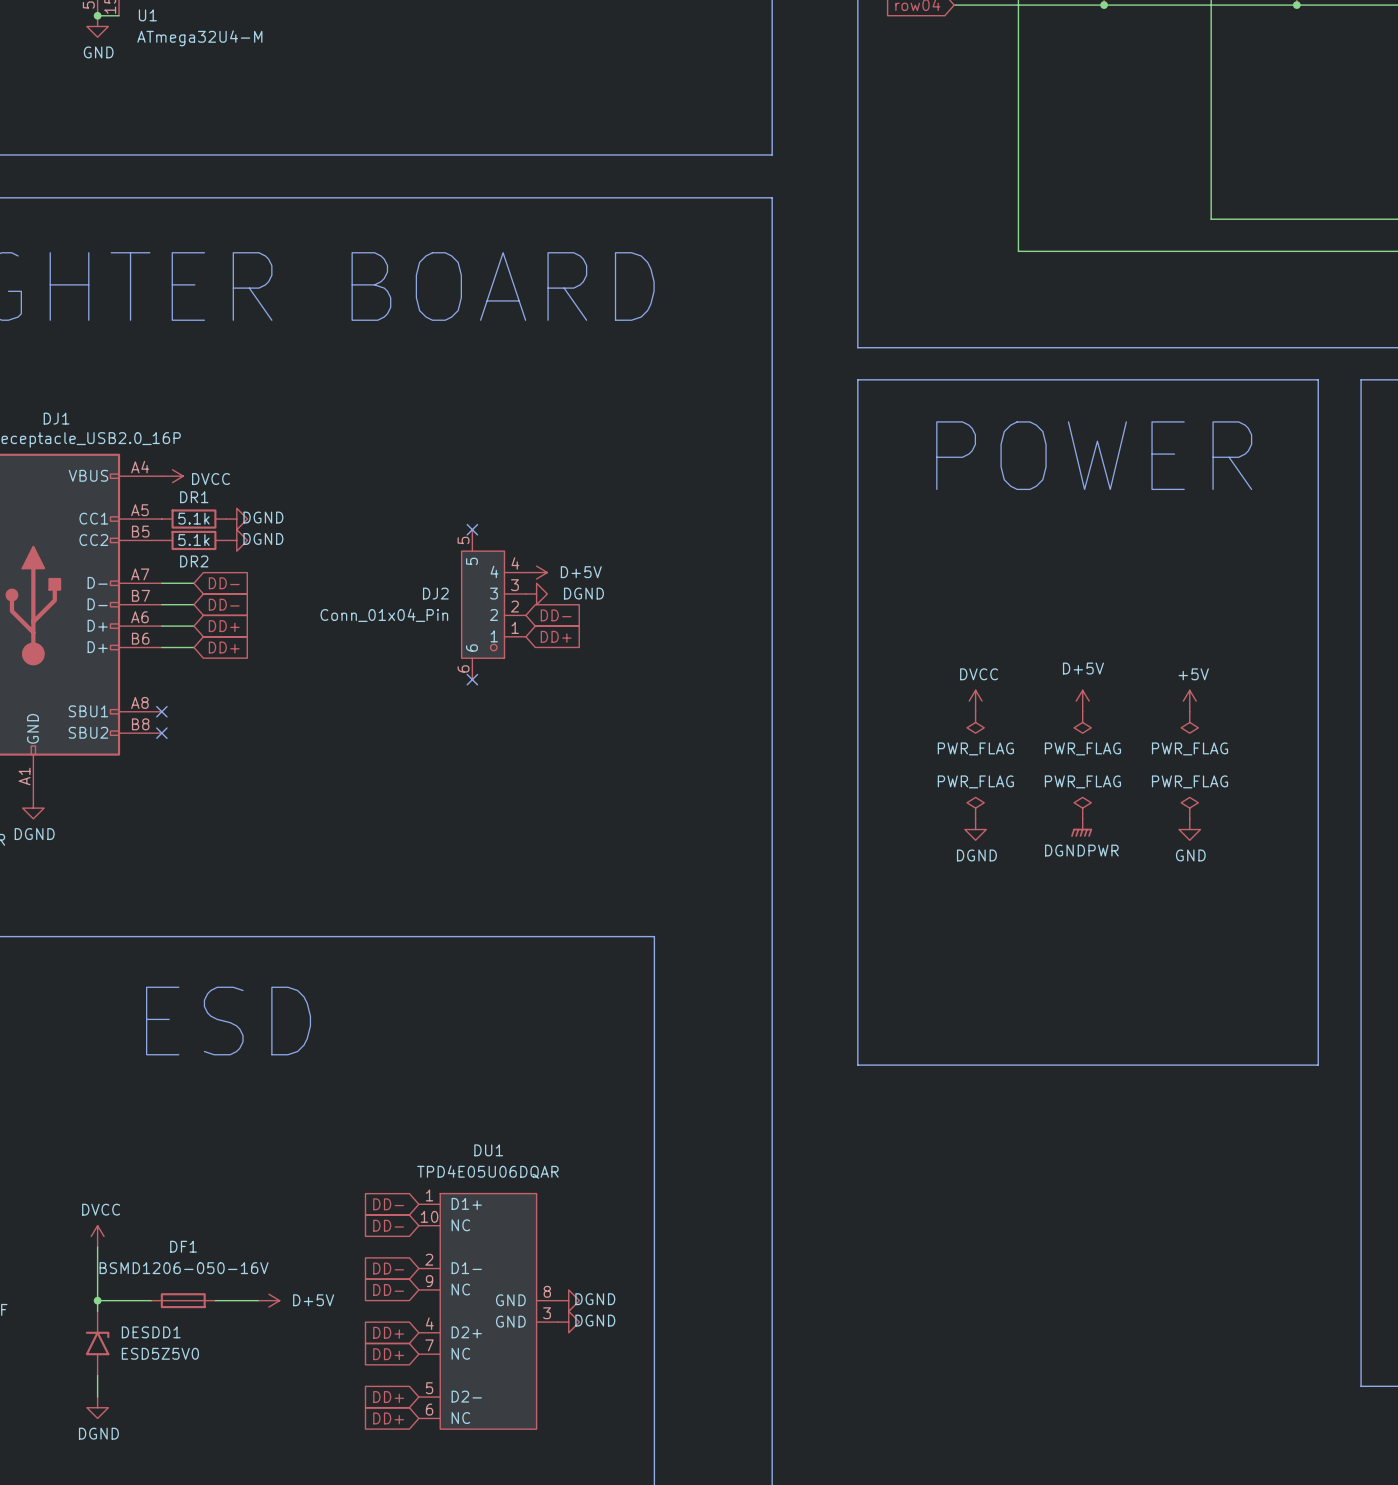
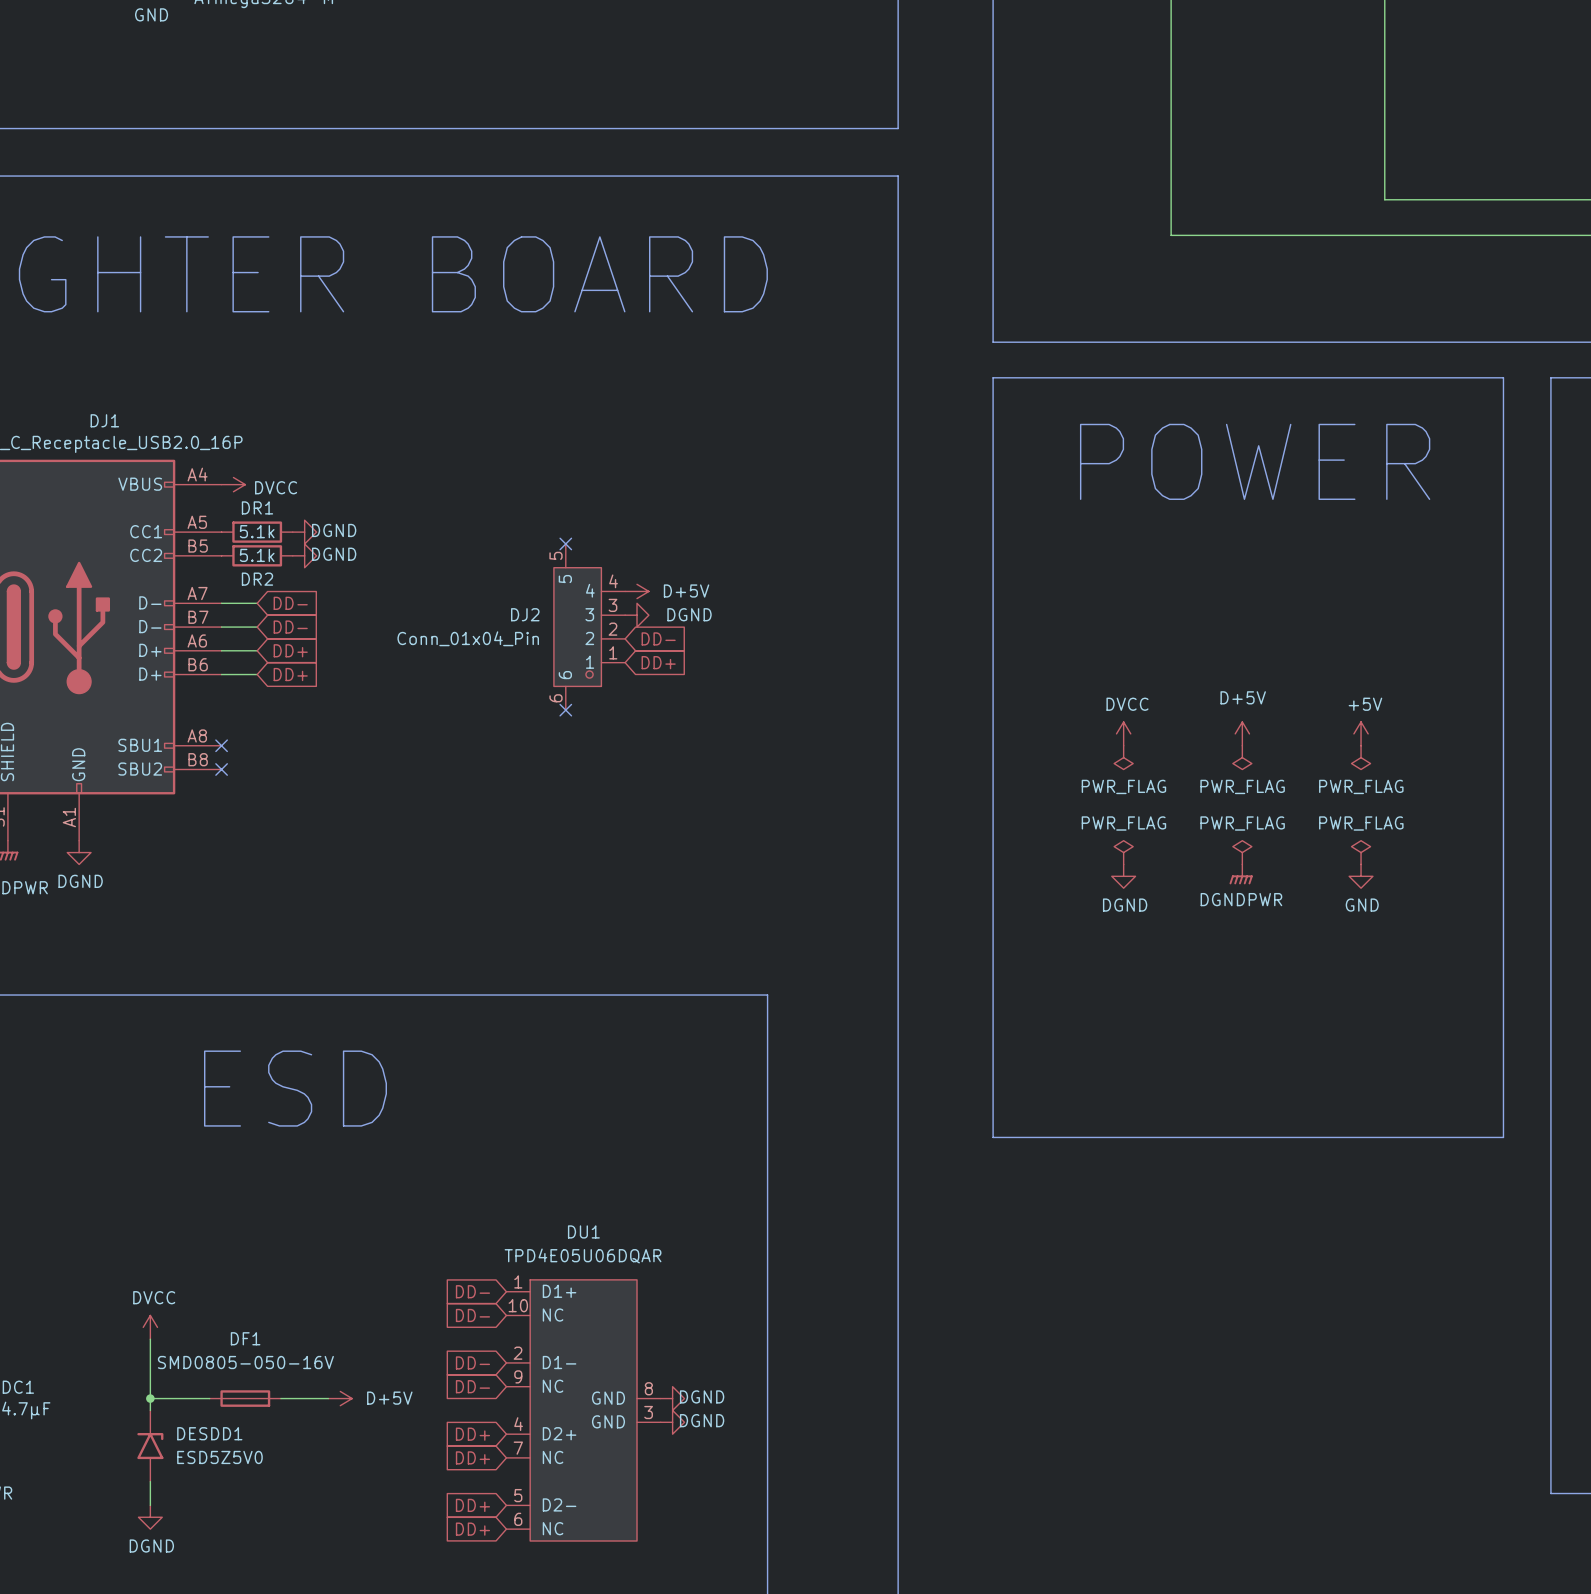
DF1 value: BSMD1206-050-16V (184, 1268) -> SMD0805-050-16V (245, 1362)

